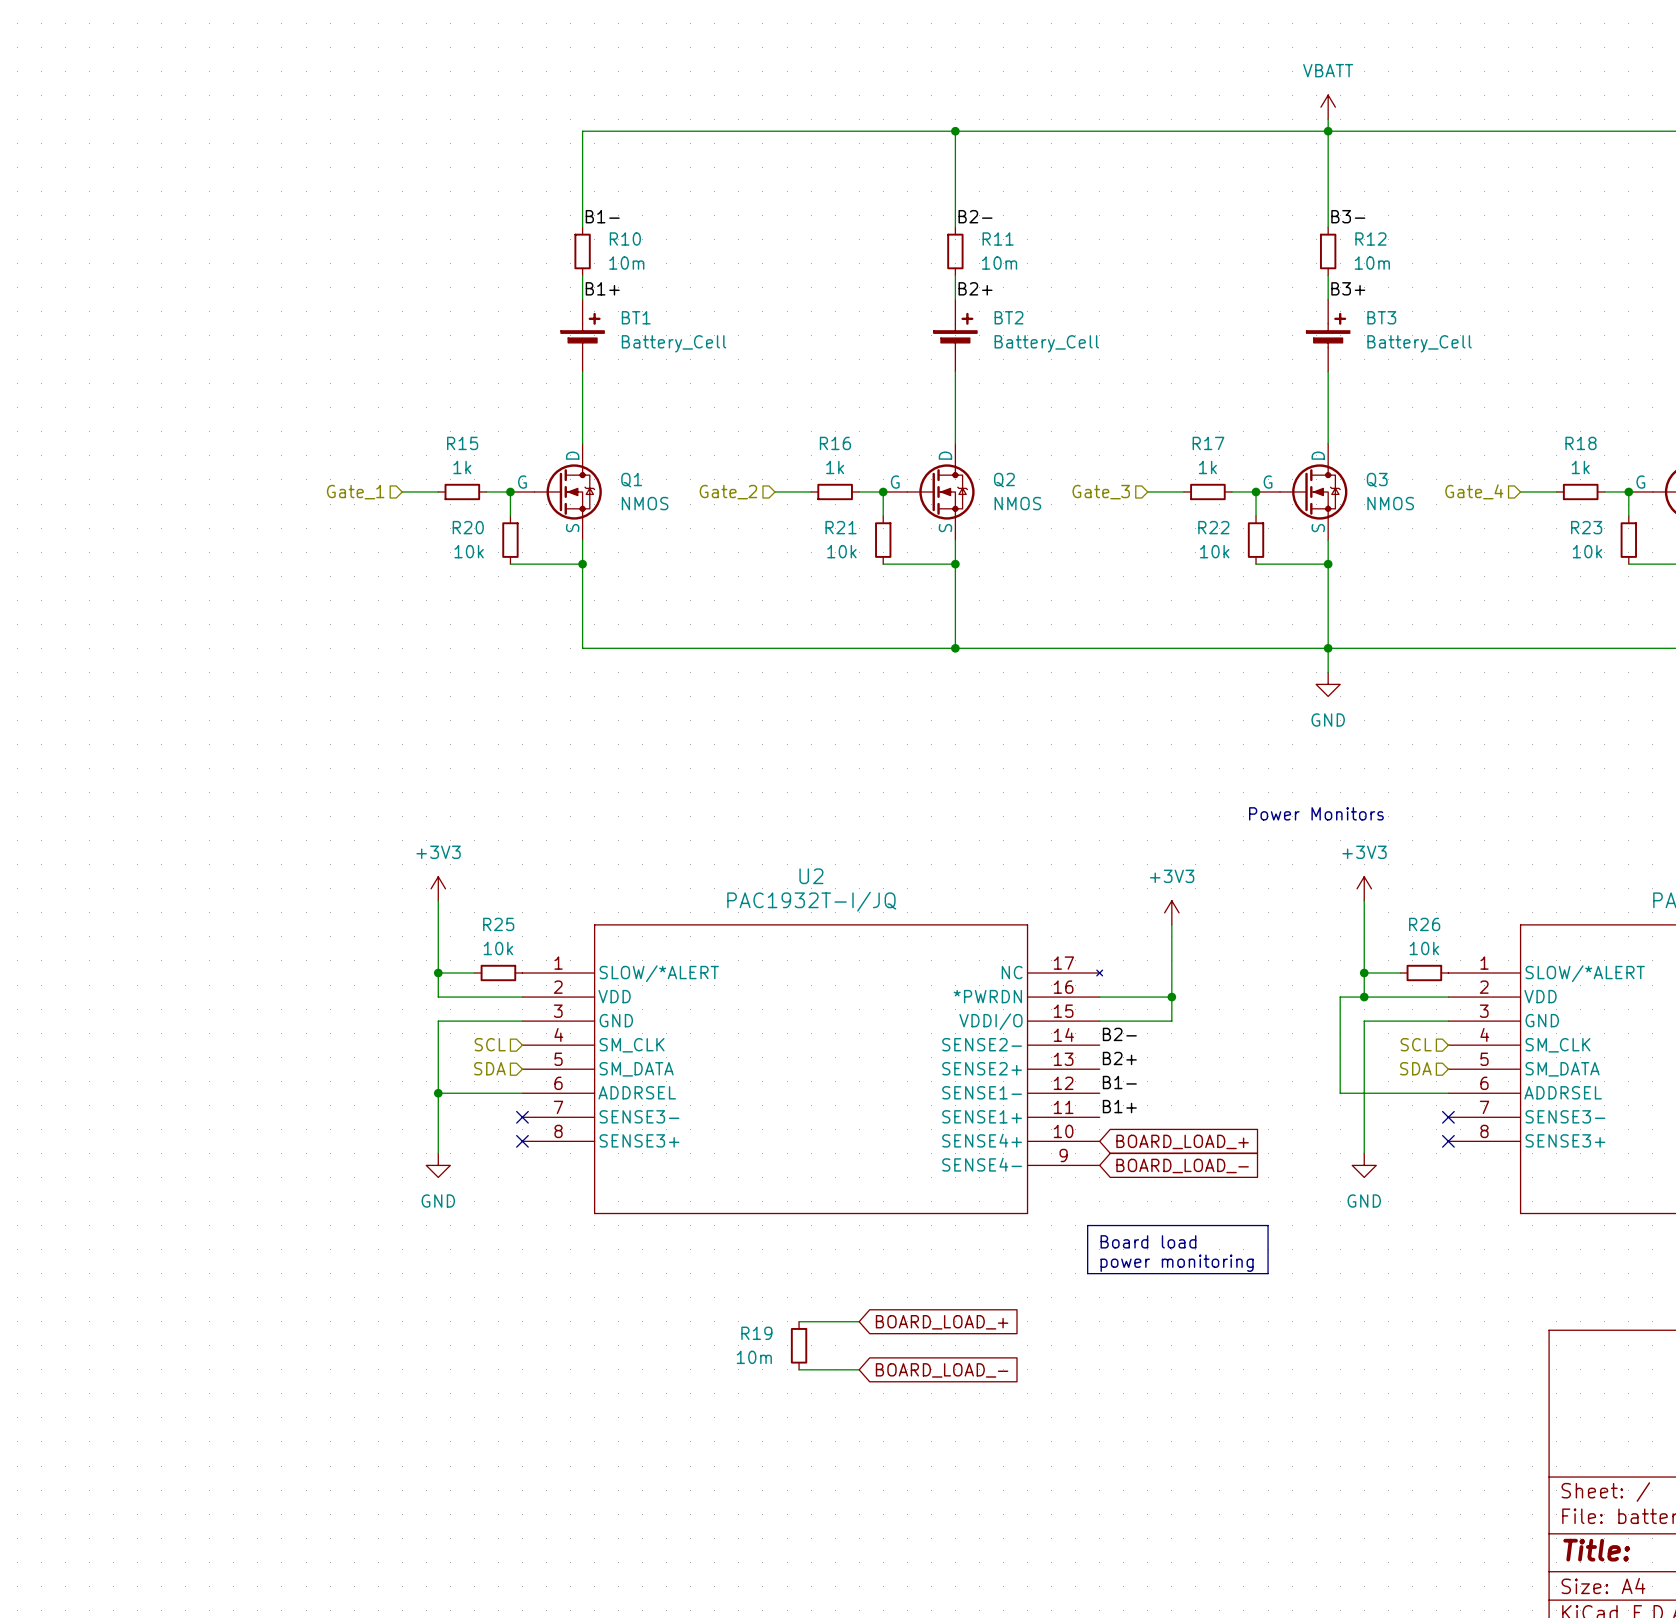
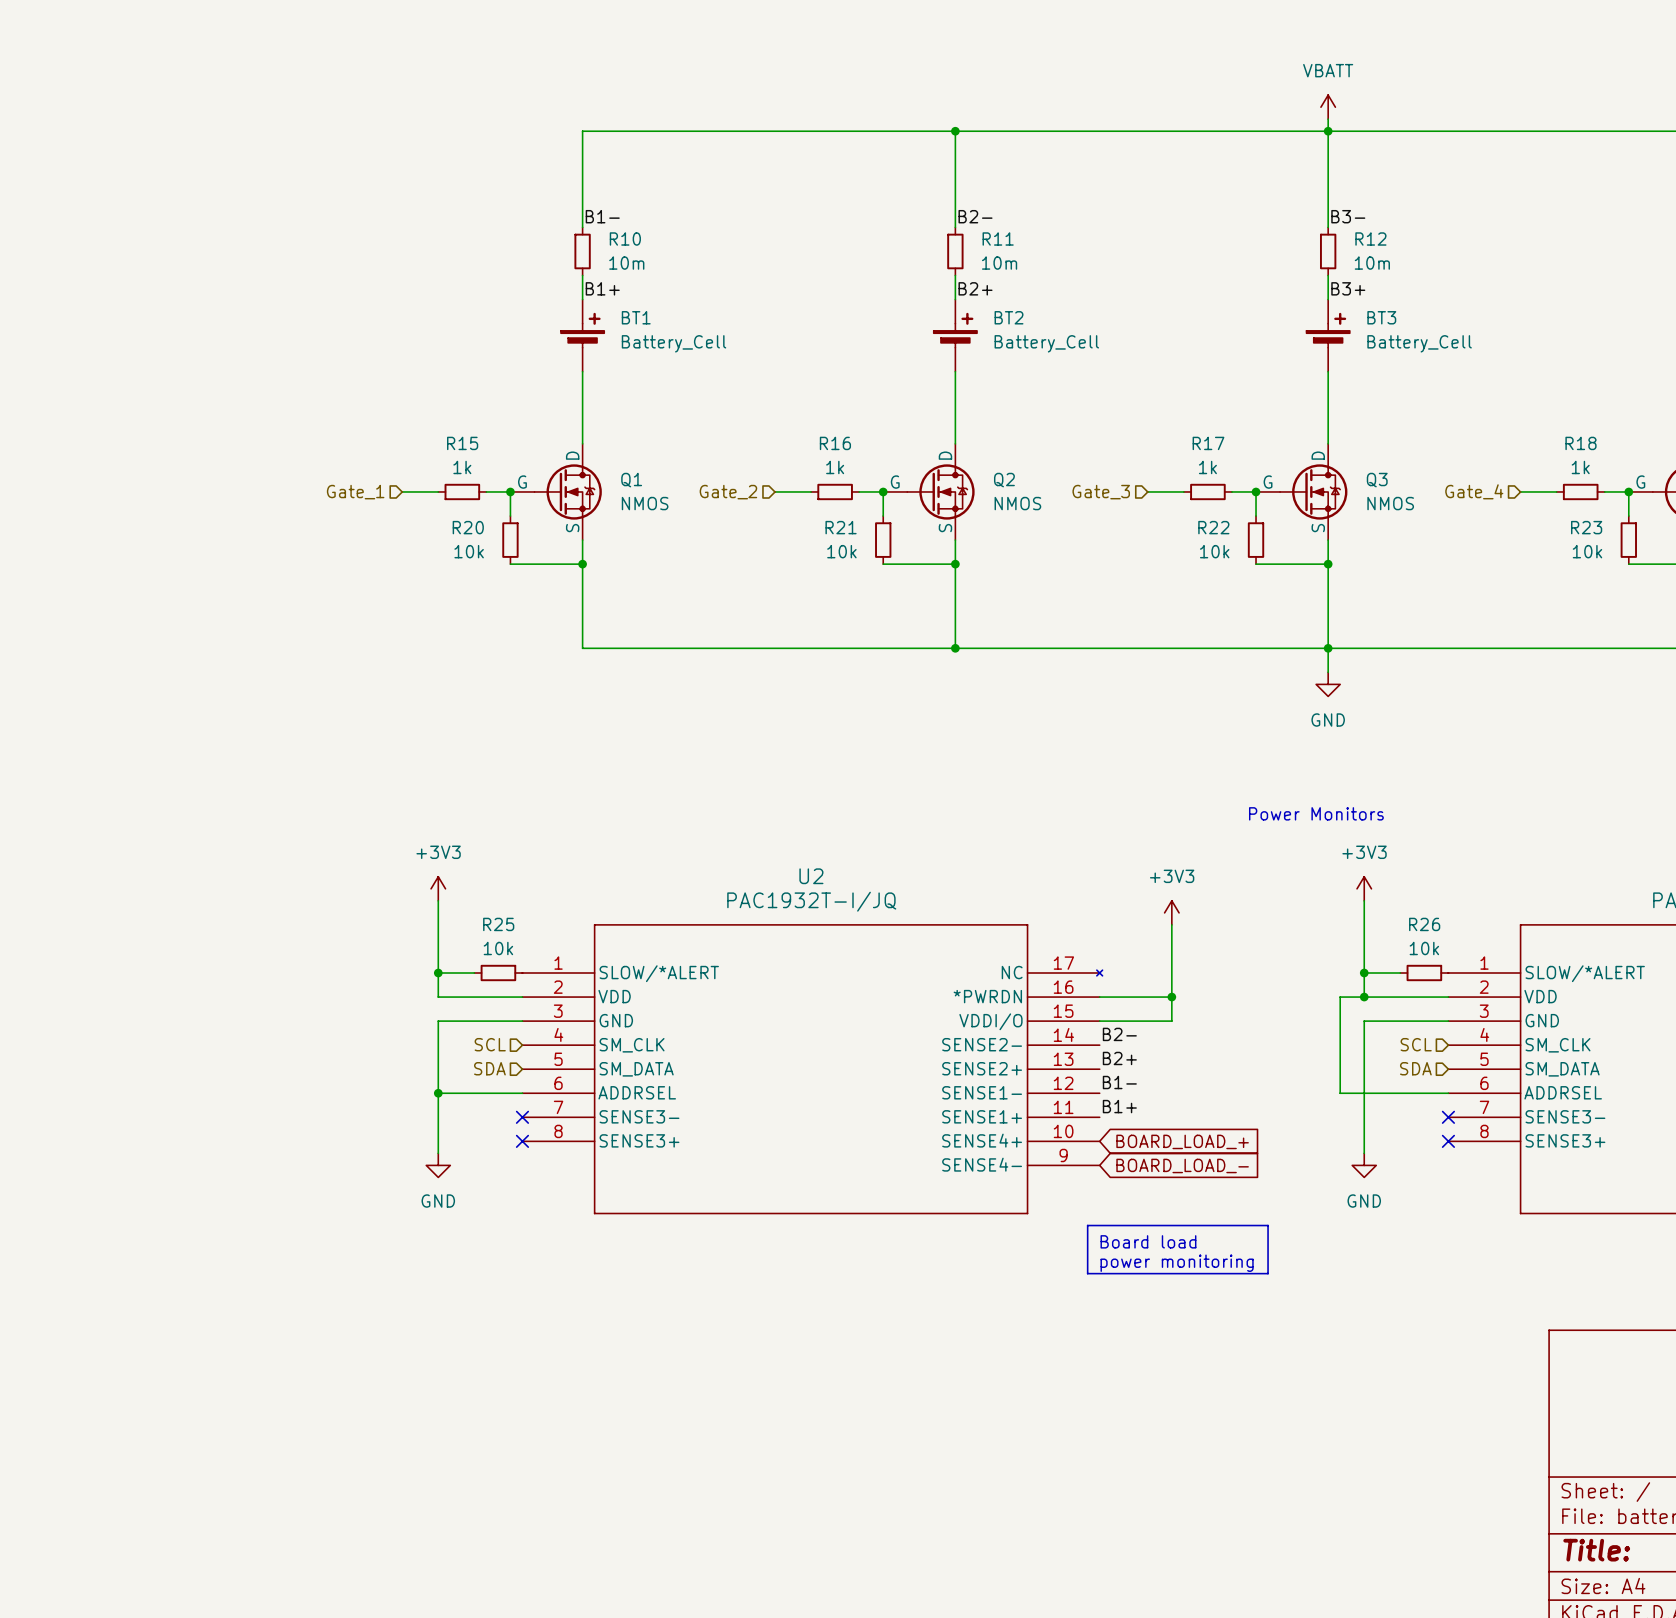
wire: (799, 1321) (859, 1321) -> none
global label: BOARD_LOAD_+ (942, 1322) -> none
R19: 10m (799, 1345) -> none
wire: (799, 1369) (859, 1369) -> none
global label: BOARD_LOAD_- (942, 1370) -> none

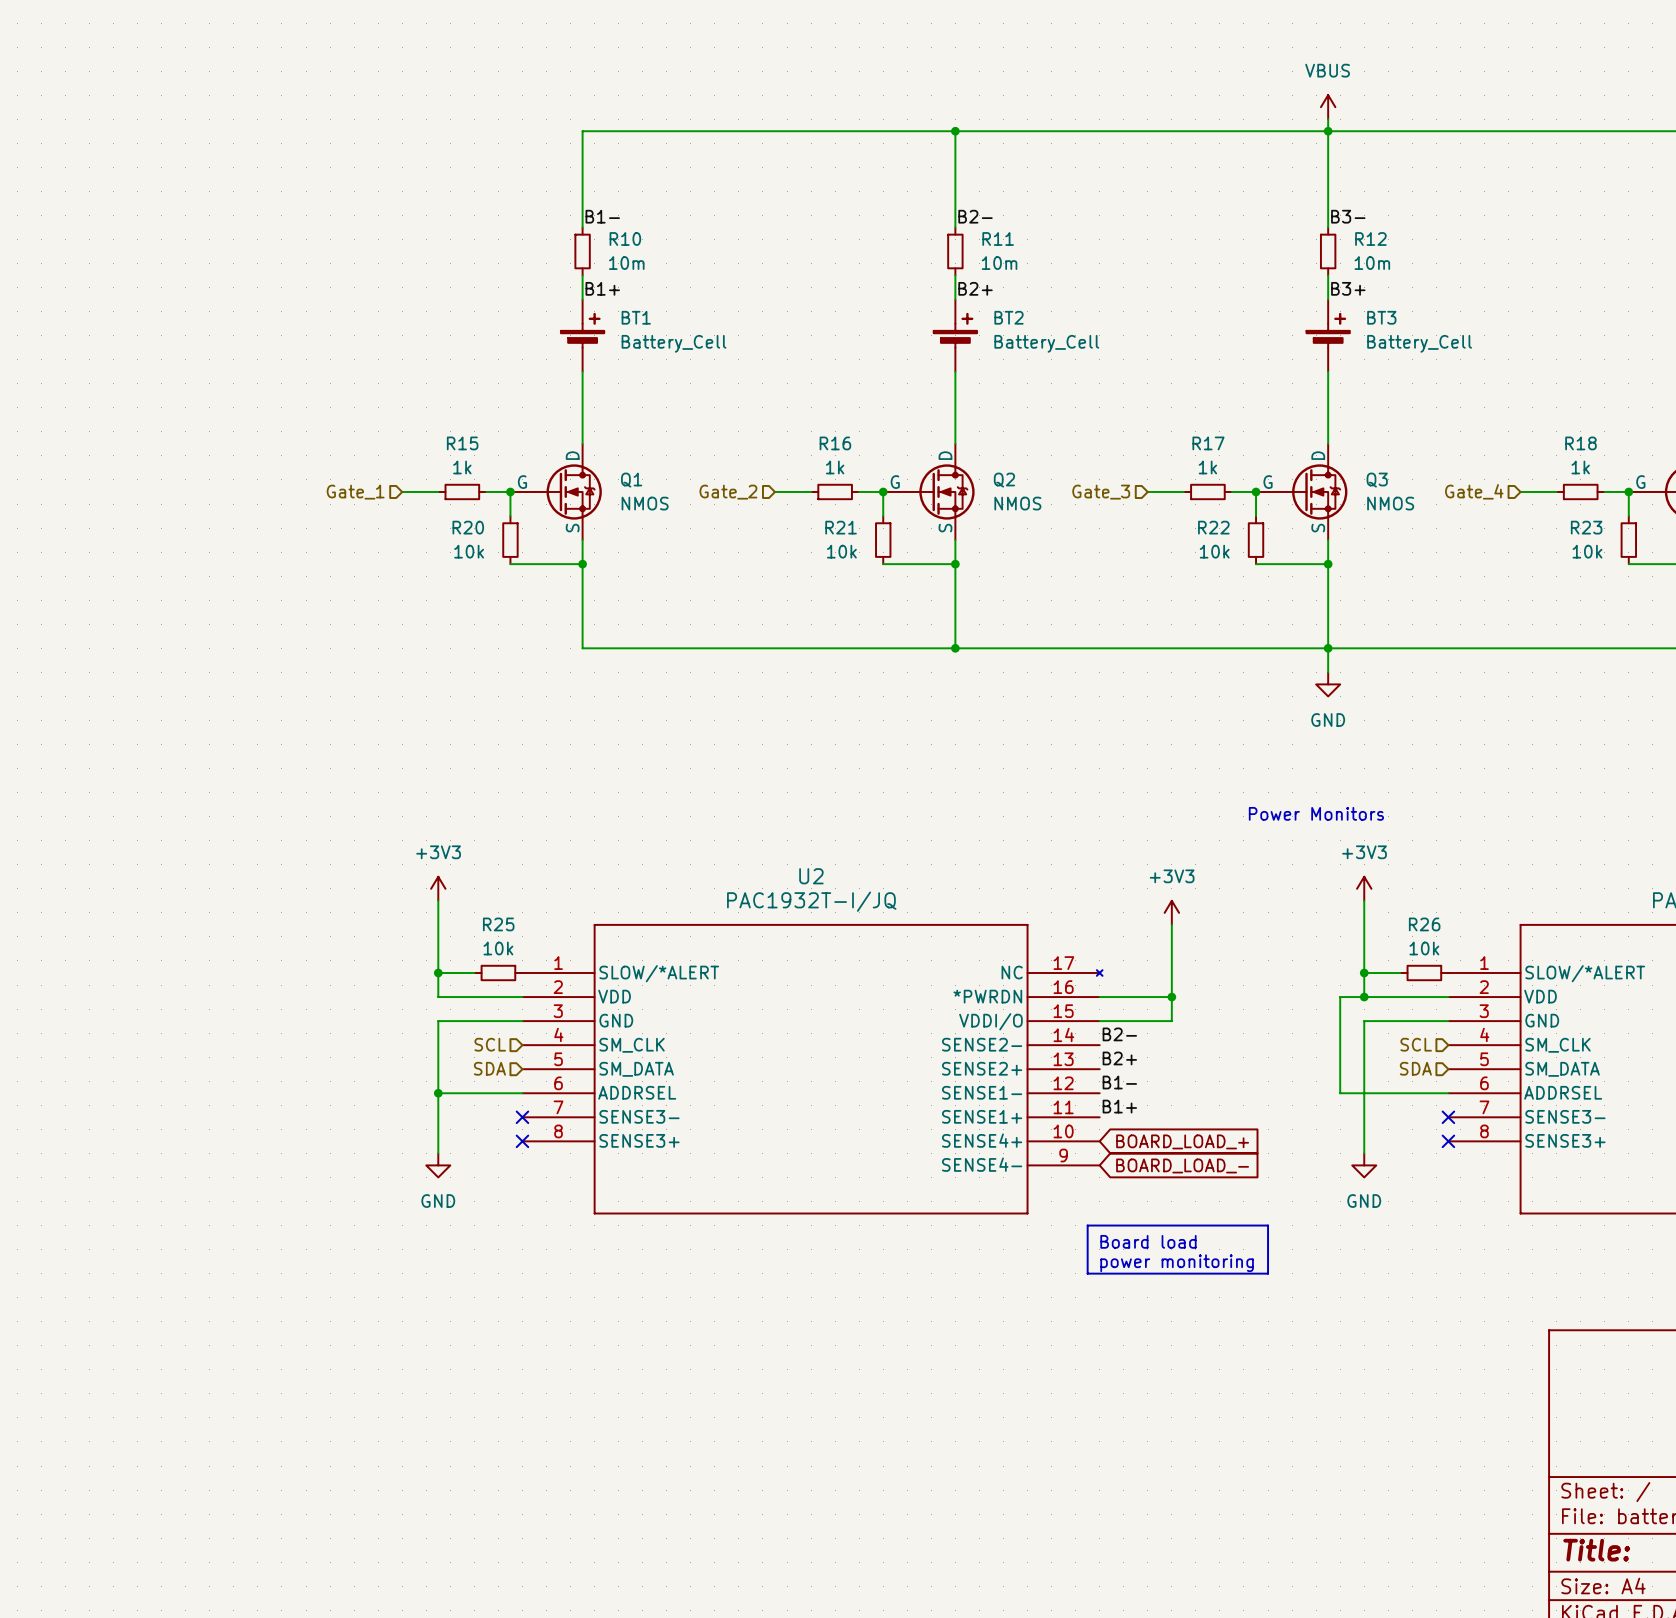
power symbol: VBATT (1328, 107) -> VBUS (1328, 107)

